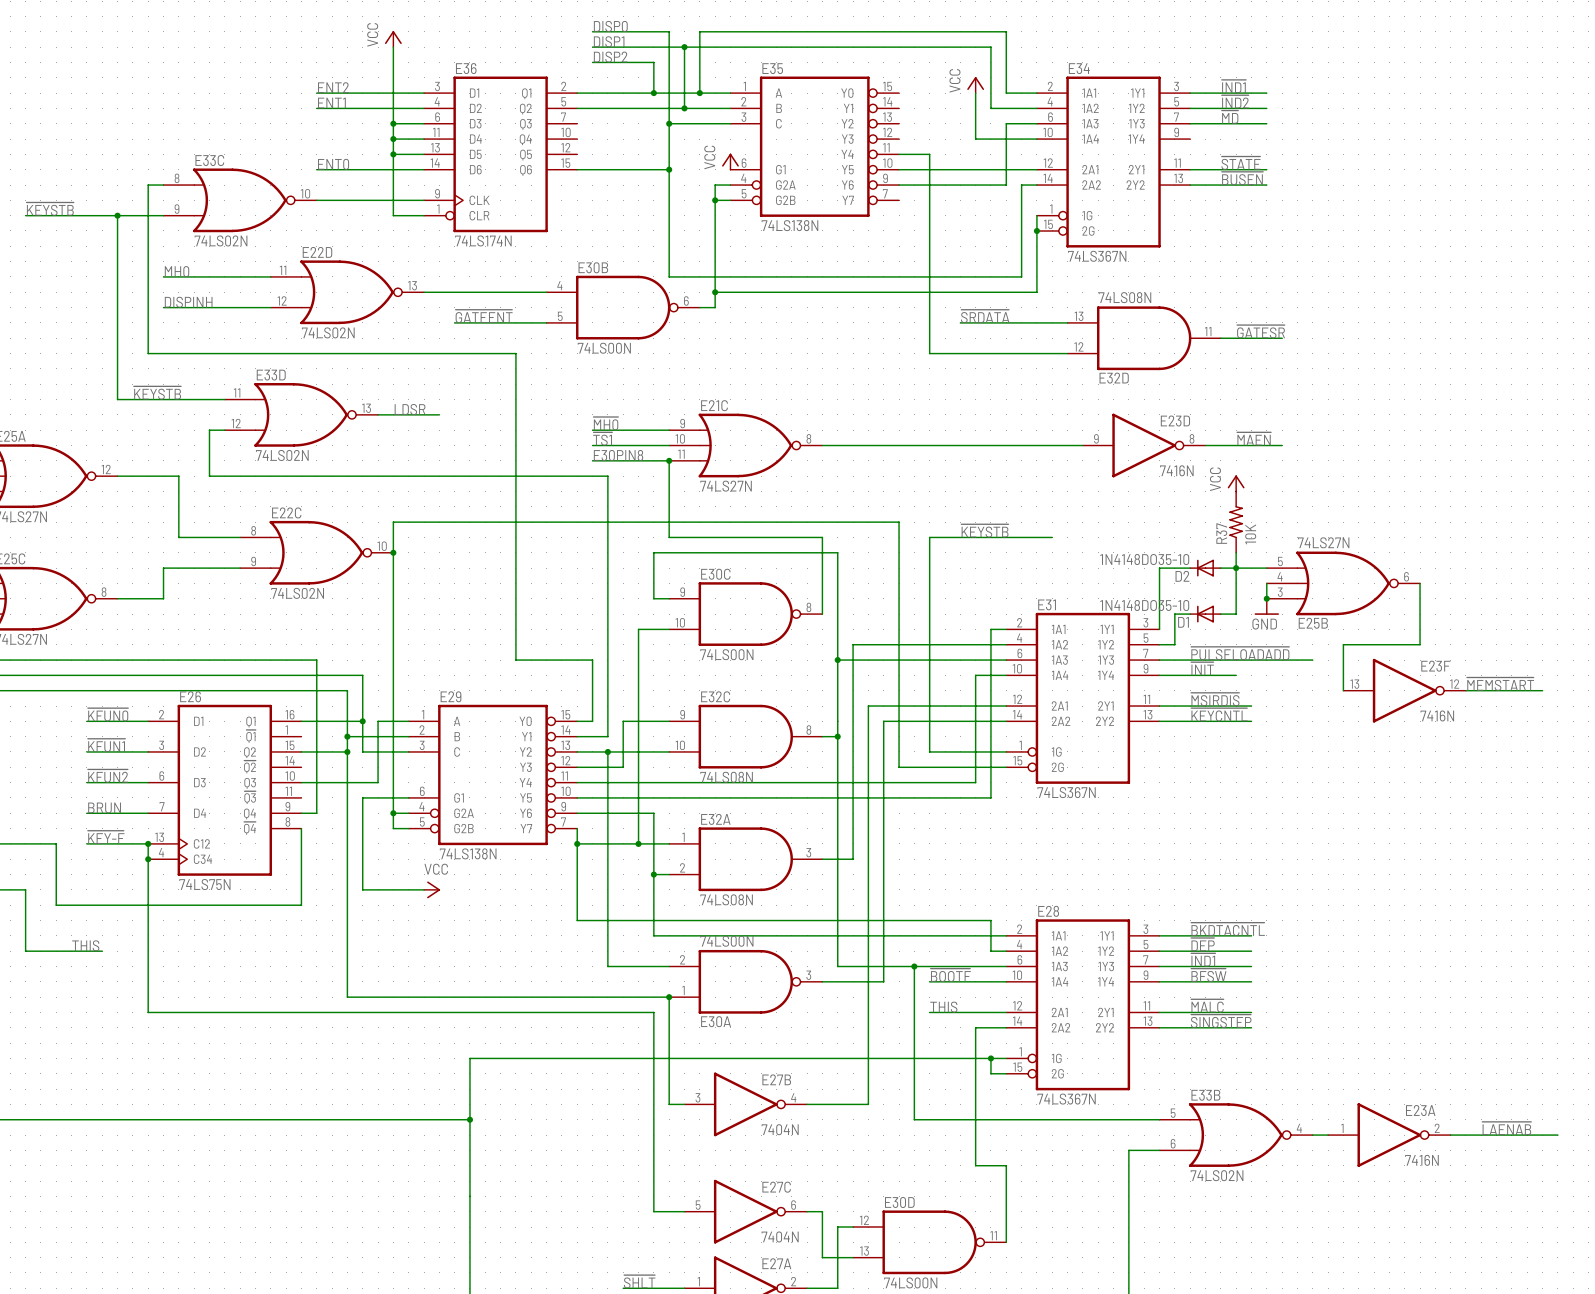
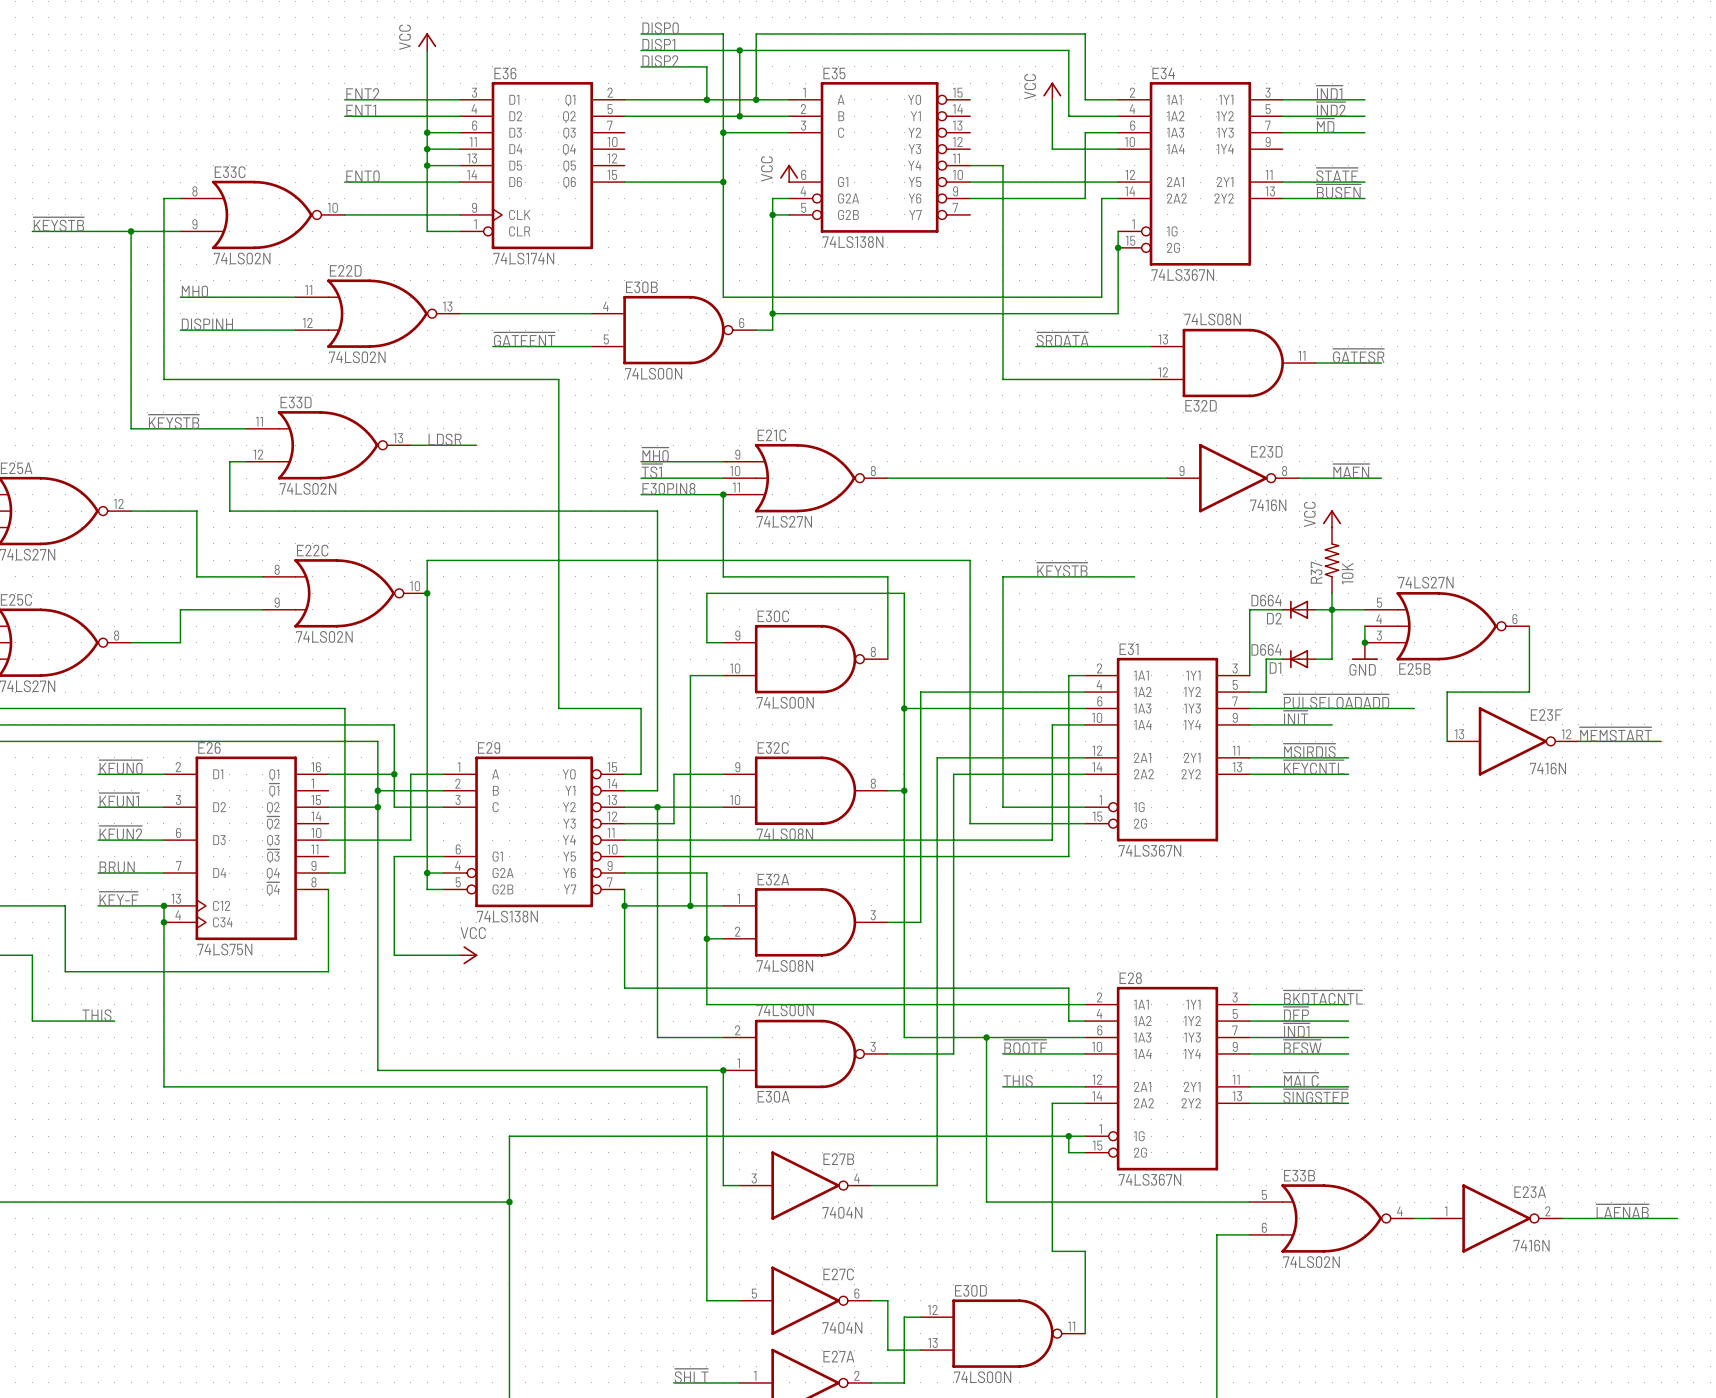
D2 value: 1N4148DO35-10 (1144, 559) -> D664 (1266, 600)
D1 value: 1N4148DO35-10 (1144, 605) -> D664 (1266, 649)

